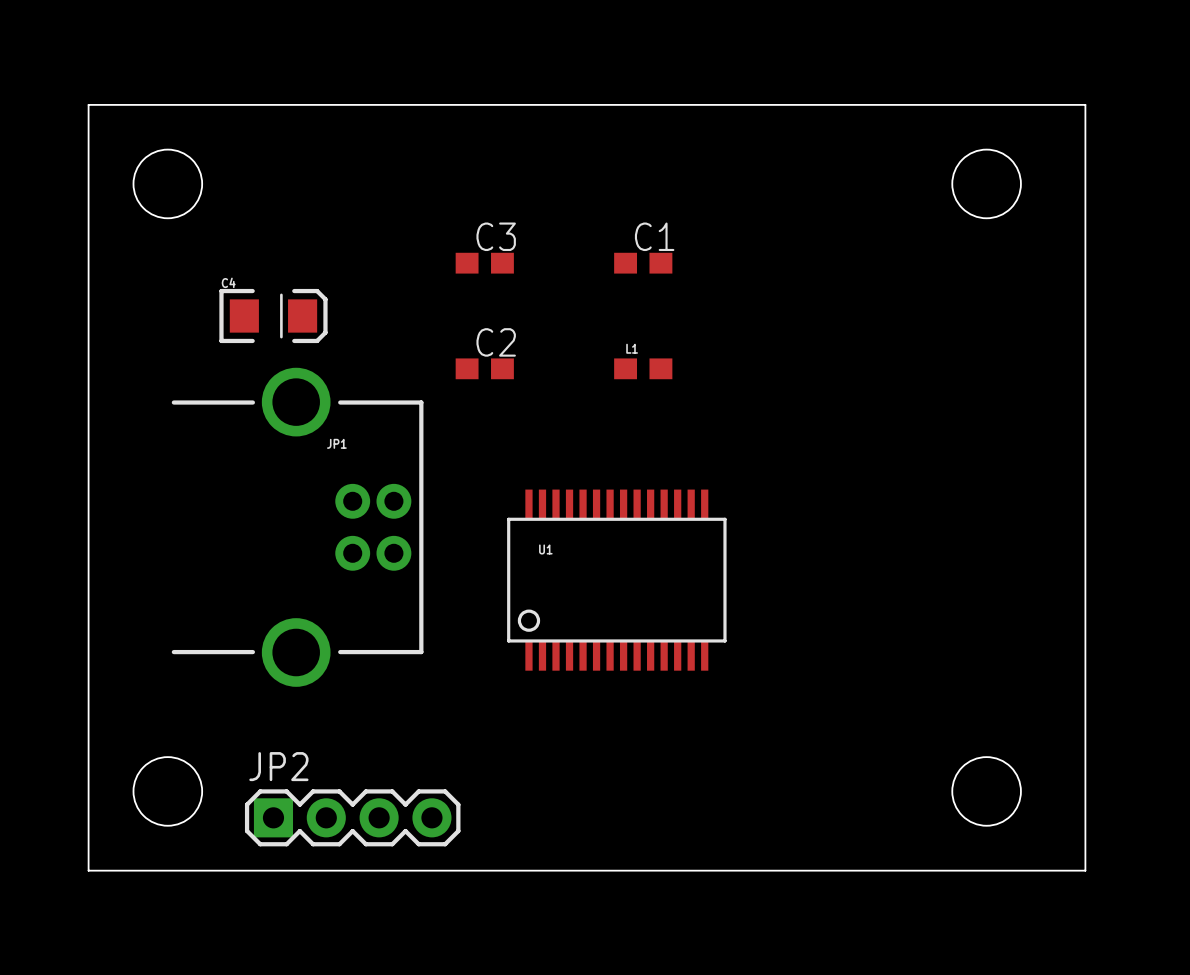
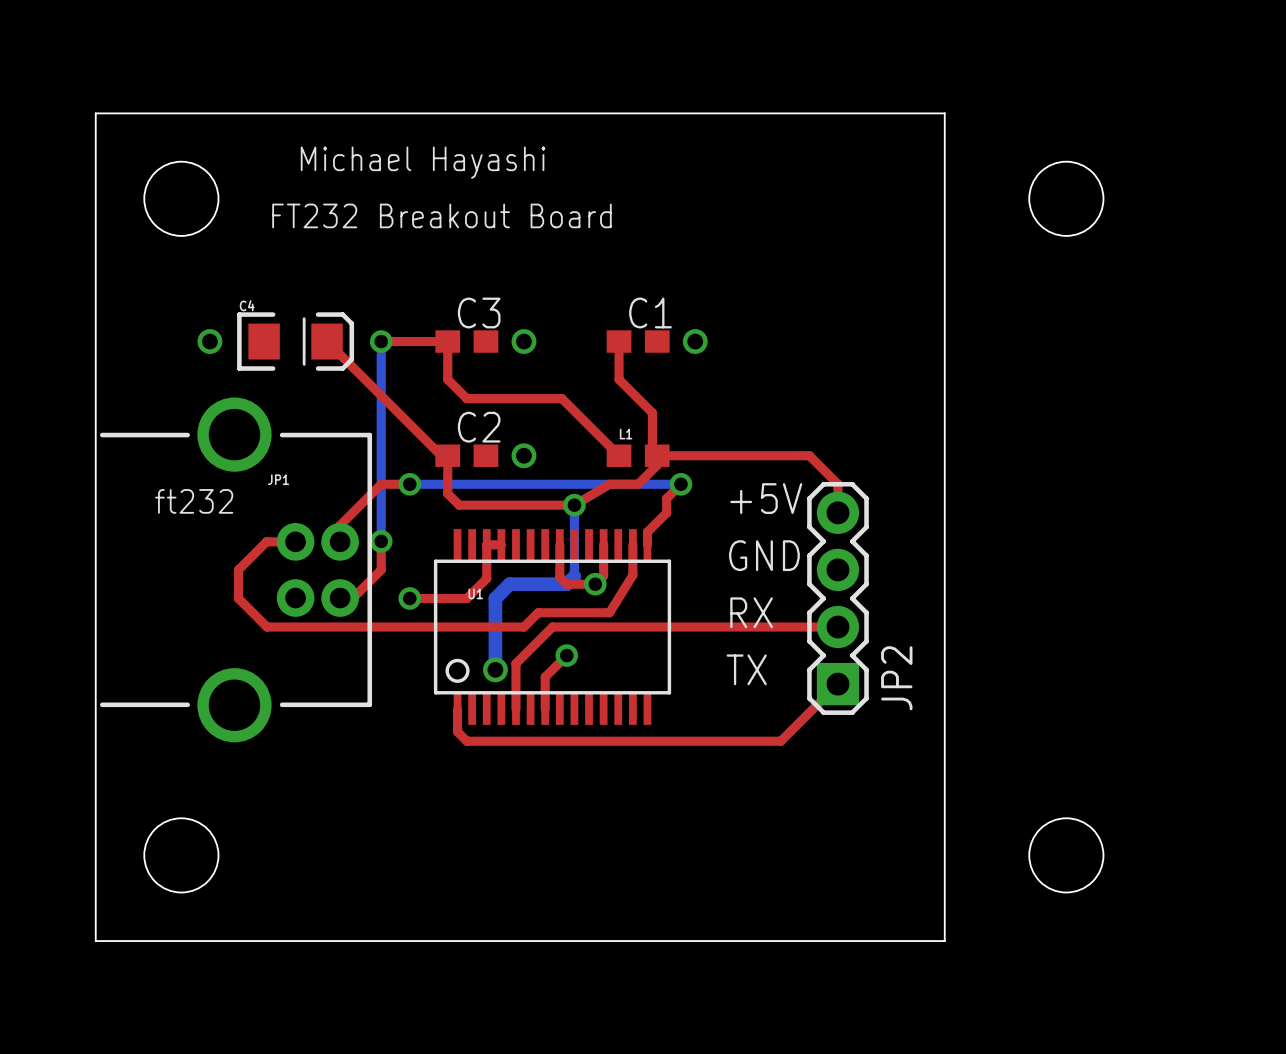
board edge: (874, 104) (1085, 104) (1085, 870) (874, 870) -> (944, 113) (944, 941)
text: none -> Michael Hayashi (423, 162)
text: none -> FT232 Breakout Board (441, 215)
C3 position: (484, 263) -> (466, 341)
C1 position: (643, 263) -> (638, 341)
via: none -> (209, 341)
top track: none -> (327, 341) (441, 455) (447, 455) (447, 493) (459, 505) (574, 505) (609, 484) (638, 484) (657, 465) (657, 455)
top track: none -> (381, 341) (447, 341) (447, 379) (466, 398) (561, 398) (619, 455)
bottom track: none -> (381, 341) (381, 541)
via: none -> (381, 341)
via: none -> (523, 341)
top track: none -> (619, 341) (619, 379) (652, 412) (652, 450) (657, 455)
via: none -> (695, 341)
C2 position: (484, 368) -> (466, 455)
L1 position: (643, 368) -> (638, 455)
via: none -> (523, 455)
top track: none -> (657, 455) (809, 455) (837, 484) (837, 512)
top track: none -> (409, 484) (381, 484) (340, 525) (340, 541)
bottom track: none -> (409, 484) (680, 484)
via: none -> (409, 484)
top track: none -> (680, 484) (666, 498) (666, 512) (647, 532) (647, 544)
via: none -> (680, 484)
text: none -> +5V (766, 498)
text: none -> ft232 (194, 501)
bottom track: none -> (574, 505) (574, 576) (566, 584) (509, 584) (495, 598) (495, 669)
via: none -> (574, 505)
top track: none -> (381, 541) (381, 569) (353, 598) (340, 598)
via: none -> (381, 541)
top track: none -> (295, 541) (266, 541) (238, 569) (238, 598) (267, 627) (523, 627) (538, 612) (609, 612) (632, 575) (632, 544)
top track: none -> (501, 544) (486, 544) (486, 578) (466, 598) (409, 598)
top track: none -> (559, 544) (559, 577) (566, 584) (595, 584) (603, 575) (603, 544)
text: none -> GND (764, 555)
JP1 position: (297, 527) -> (236, 569)
via: none -> (595, 584)
via: none -> (409, 598)
text: none -> RX (751, 612)
U1 position: (616, 580) -> (552, 627)
top track: none -> (837, 627) (552, 627) (515, 663) (515, 709)
top track: none -> (566, 655) (545, 677) (545, 709)
via: none -> (566, 655)
via: none -> (495, 669)
text: none -> TX (746, 669)
top track: none -> (837, 684) (780, 741) (466, 741) (457, 731) (457, 709)
JP2 name position: JP2 (278, 766) -> JP2 (896, 678)
JP2 rotation: 0° (352, 817) -> 90° counterclockwise (837, 598)
JP2 position: (352, 817) -> (837, 598)

